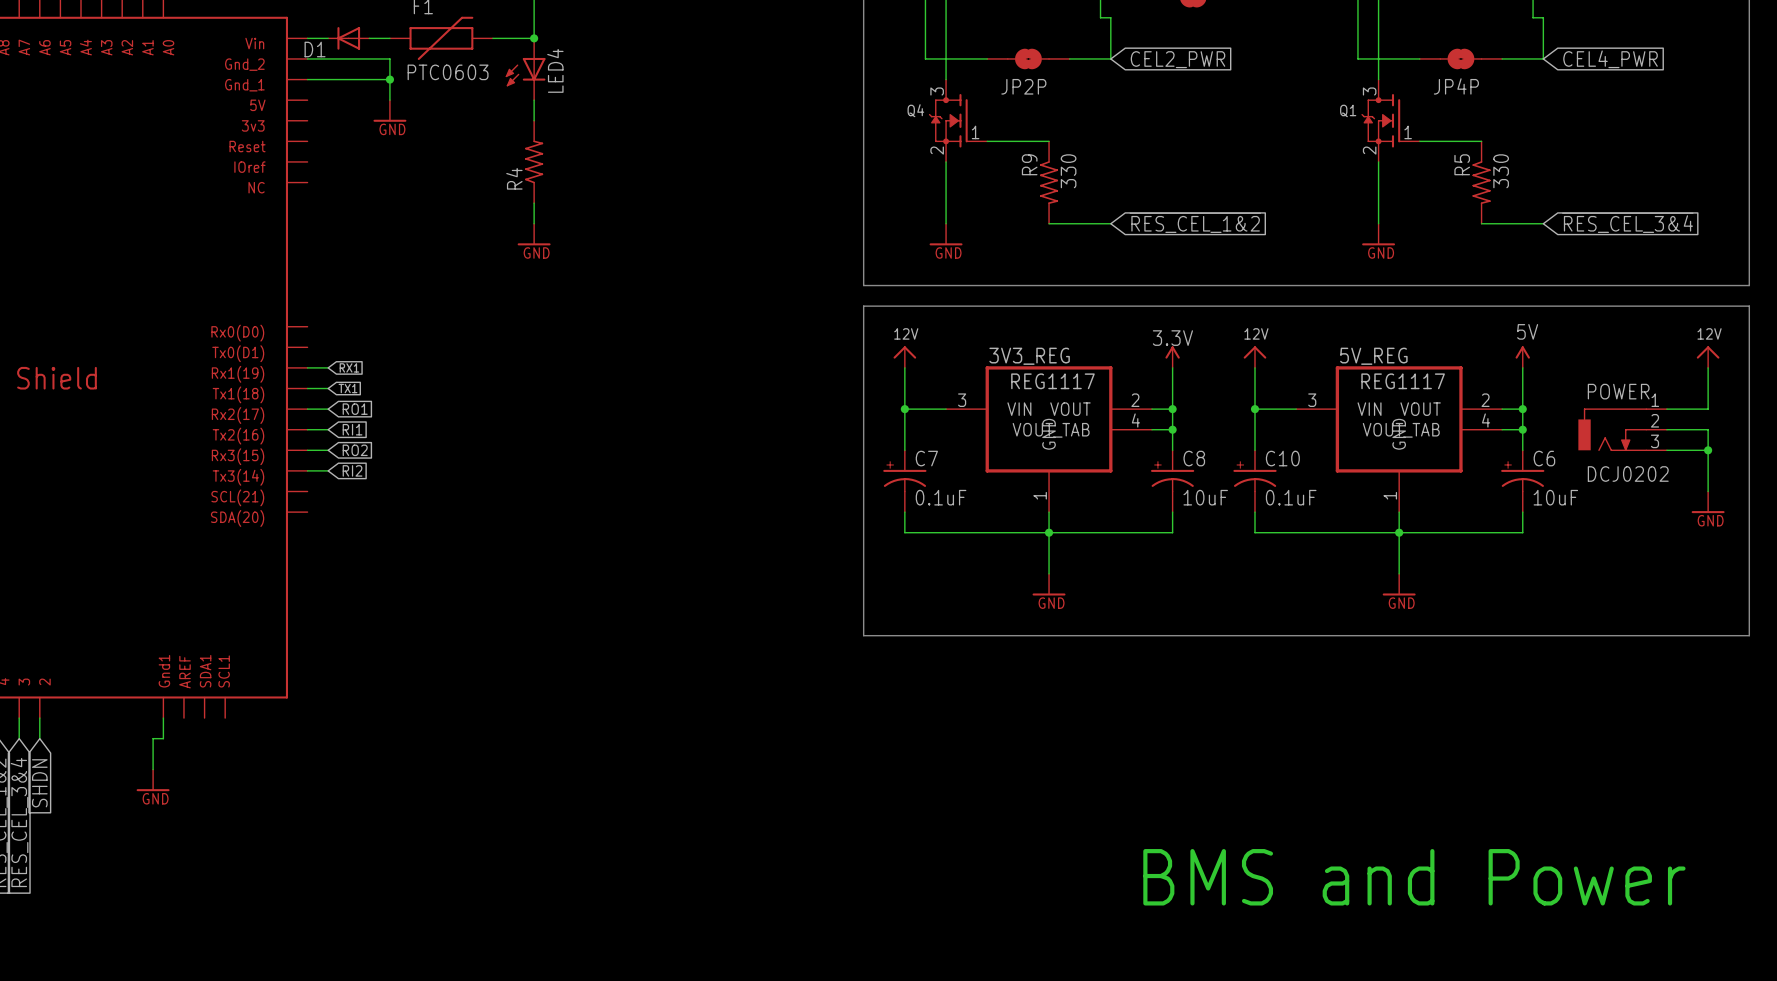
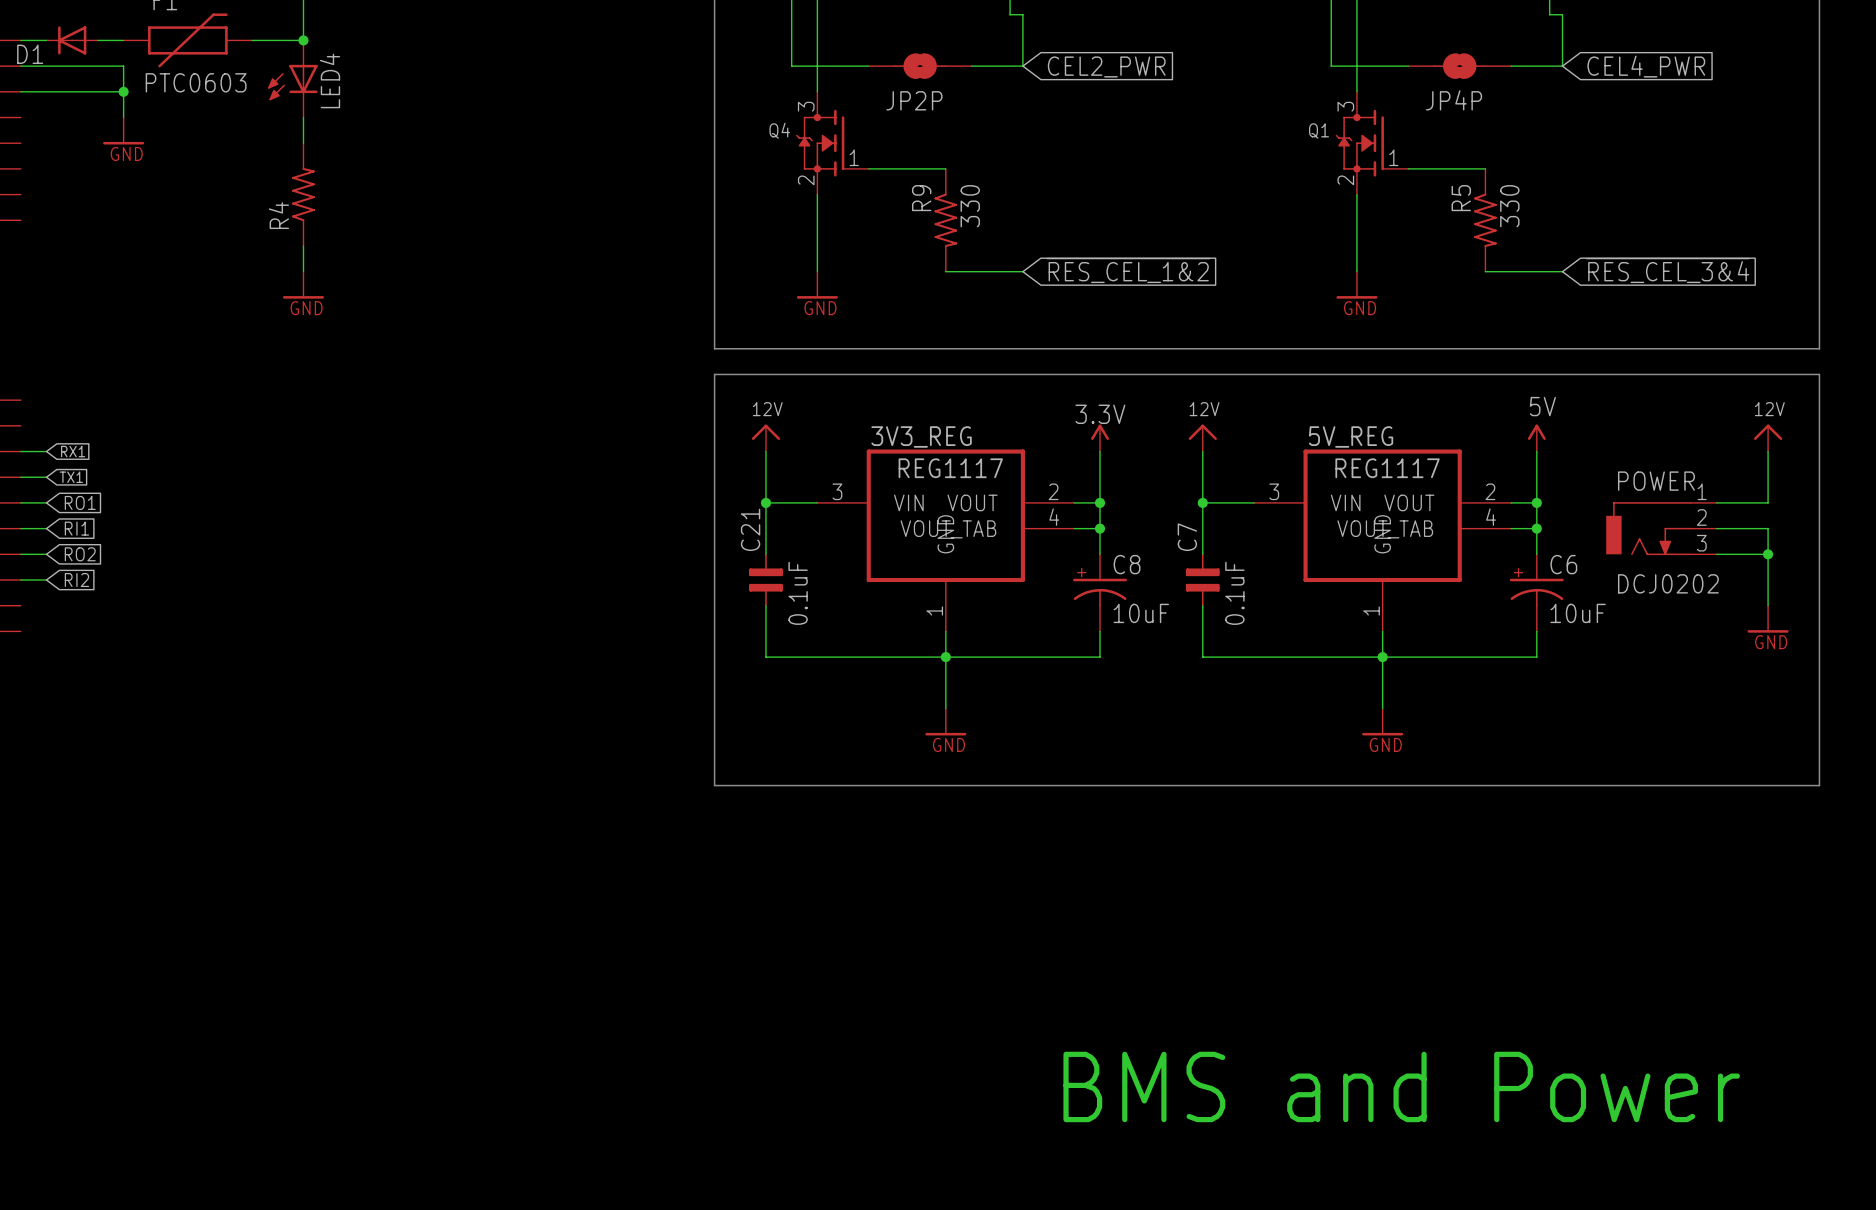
C7 symbol: [883, 450, 927, 513] -> [1186, 553, 1220, 607]
C7 name position: C7 (926, 458) -> C7 (1187, 537)
C21: none -> 0.1uF (765, 580)
C10: 0.1uF (1254, 481) -> none
C7 value position: 0.1uF (941, 497) -> 0.1uF (1234, 593)

